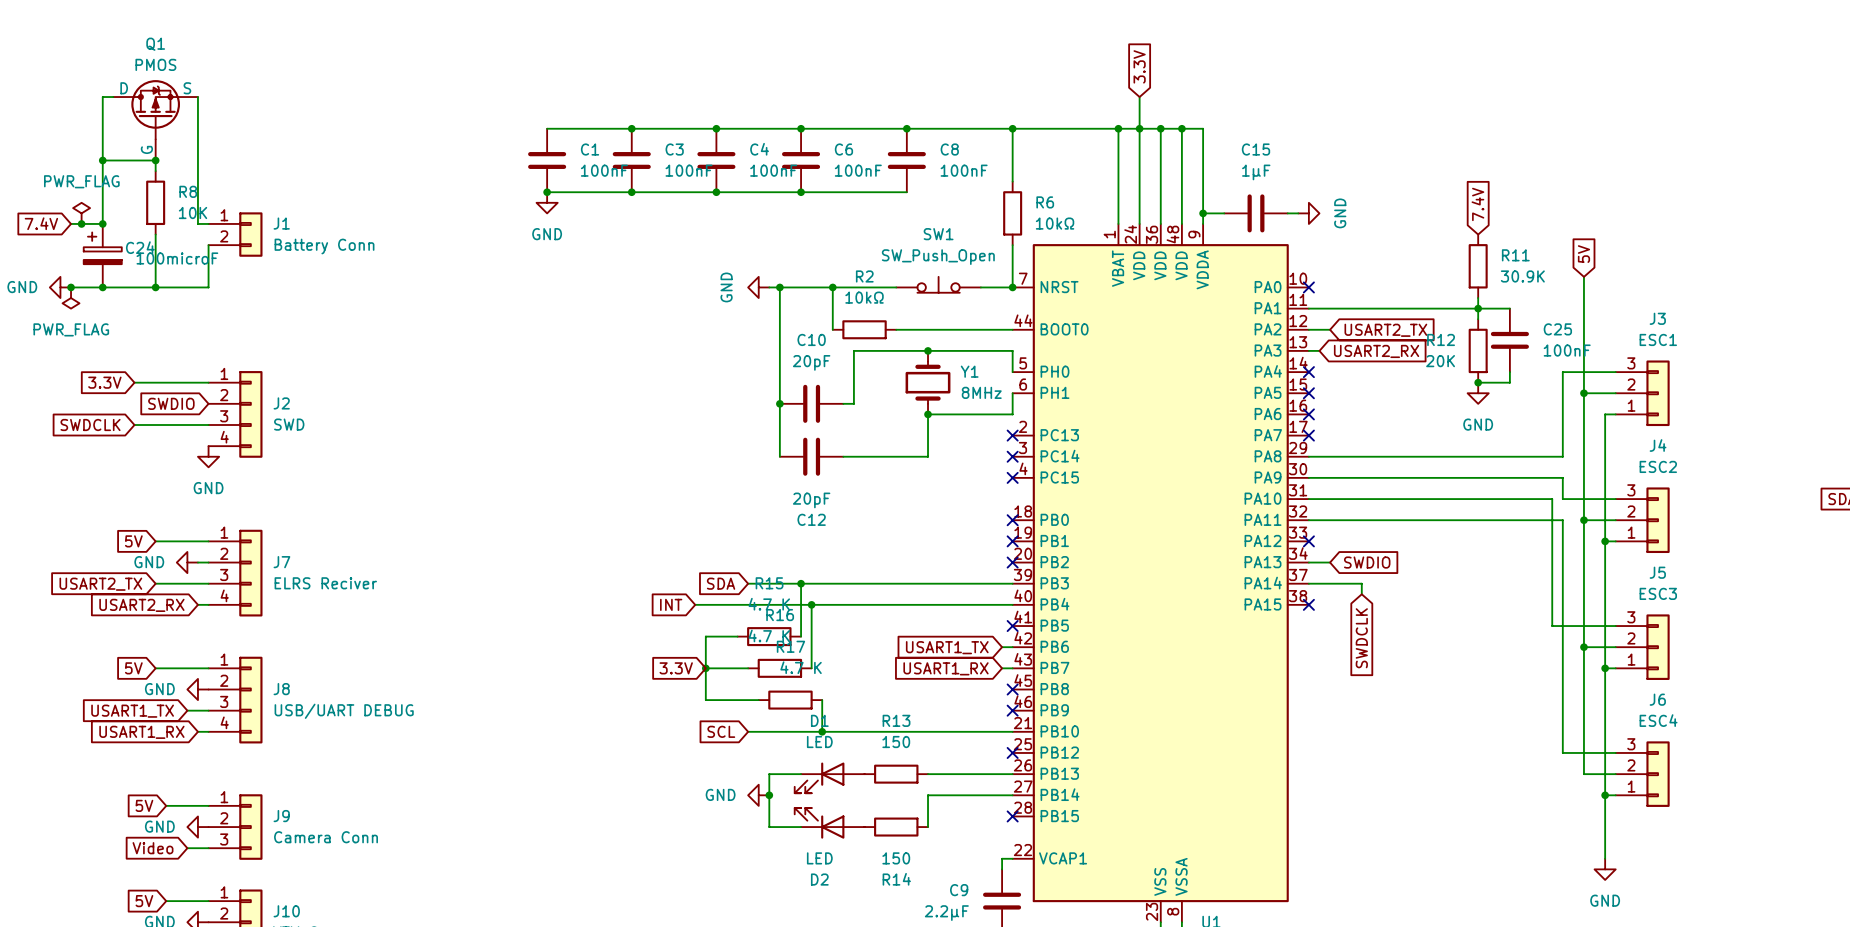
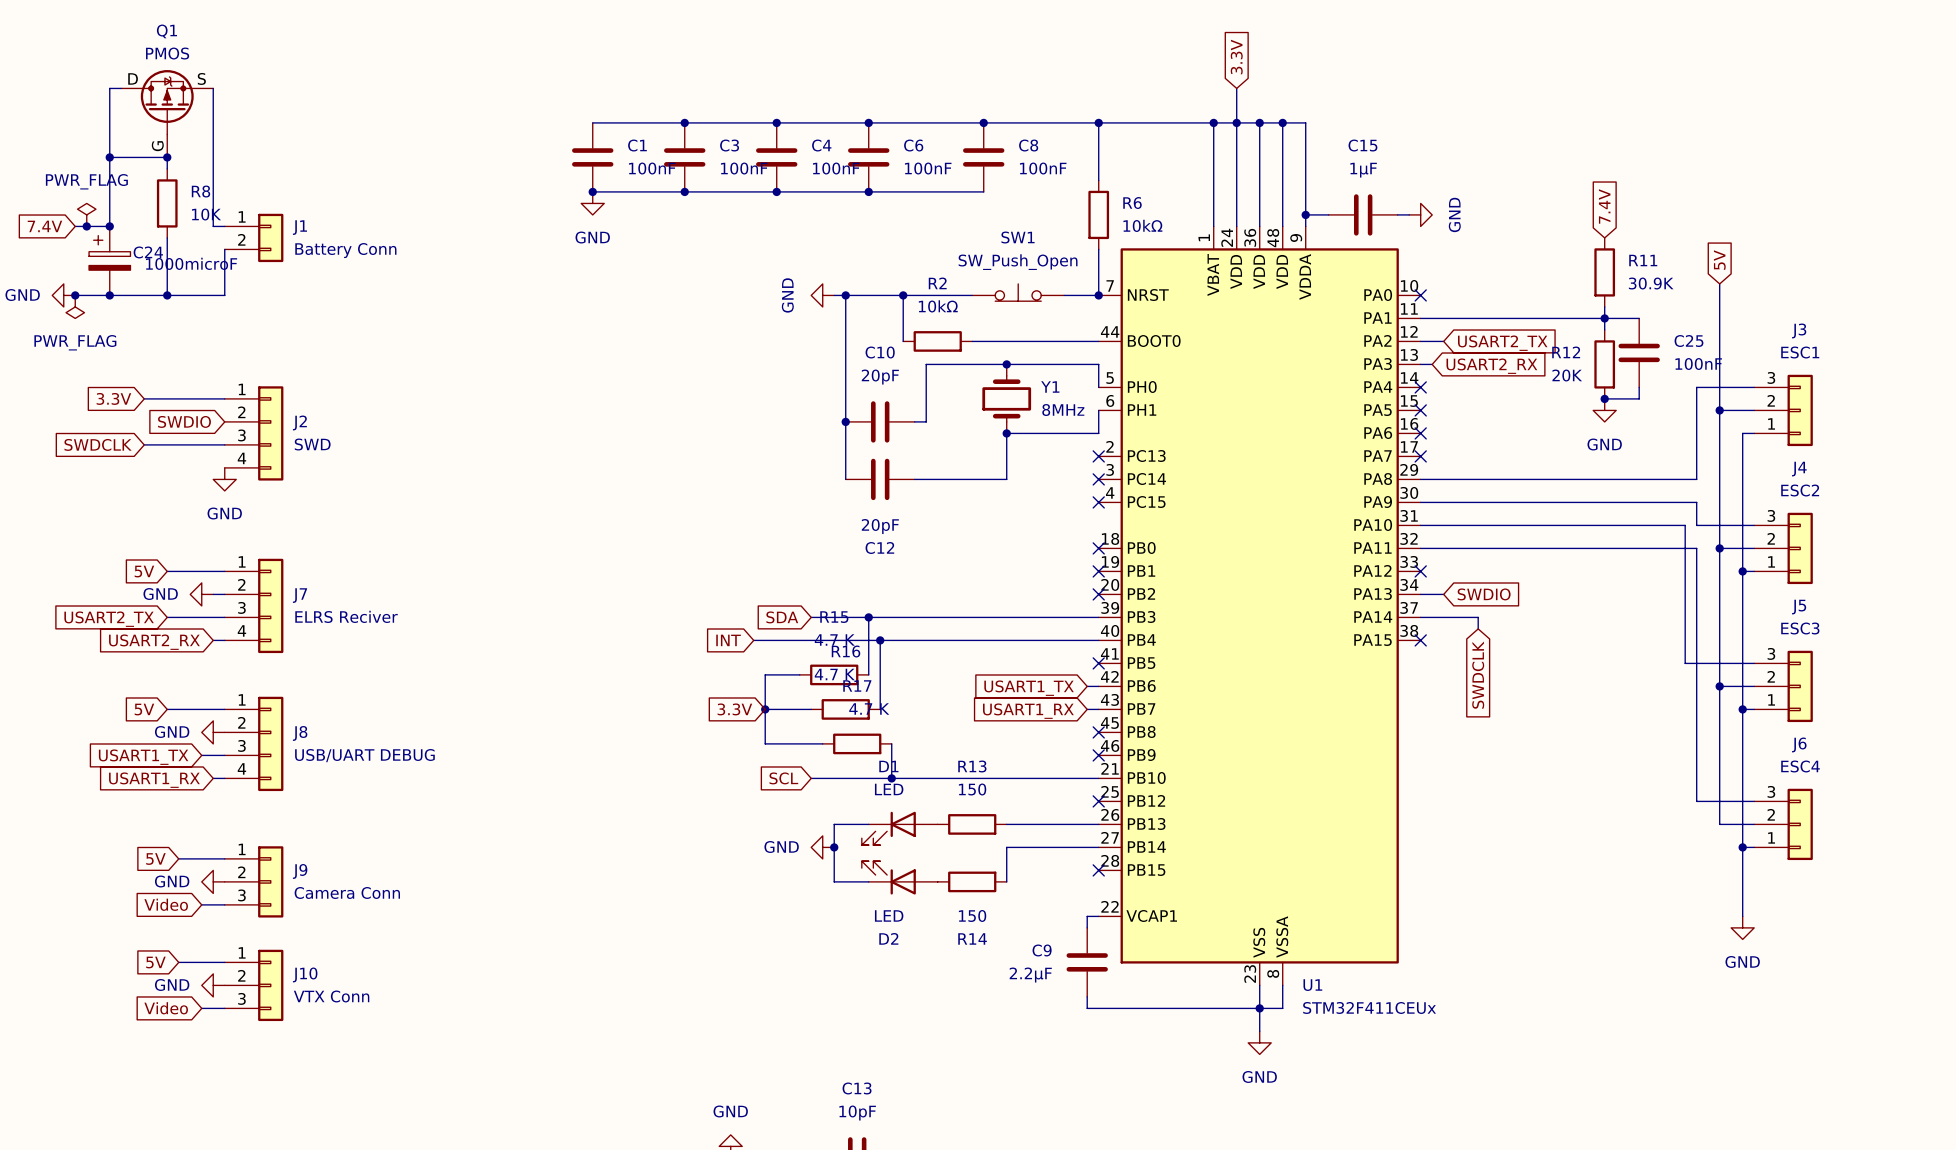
C24 value: 100microF (177, 258) -> 1000microF (191, 263)

